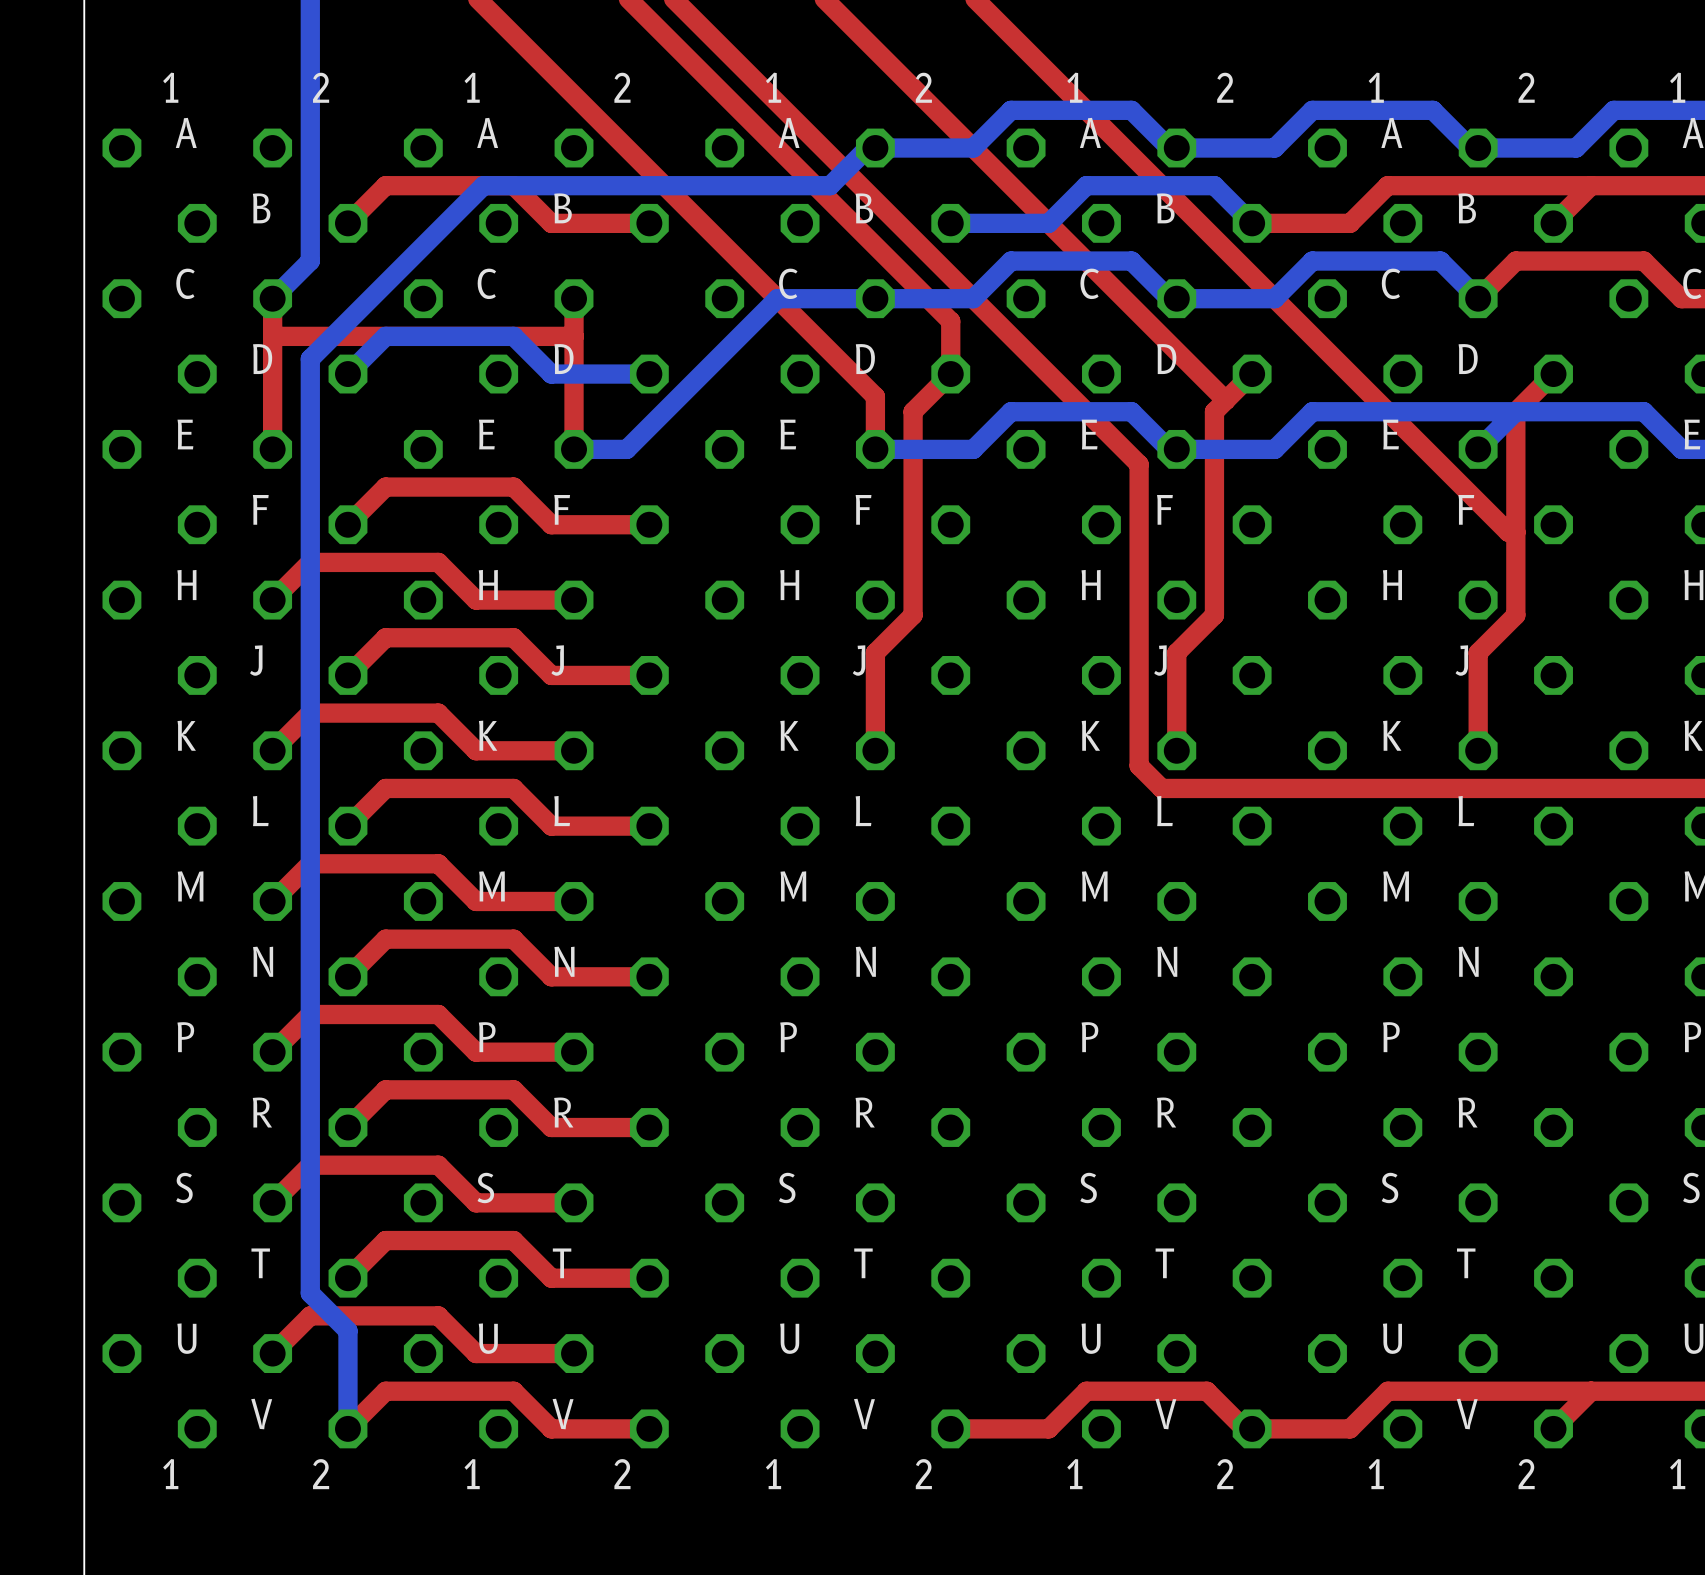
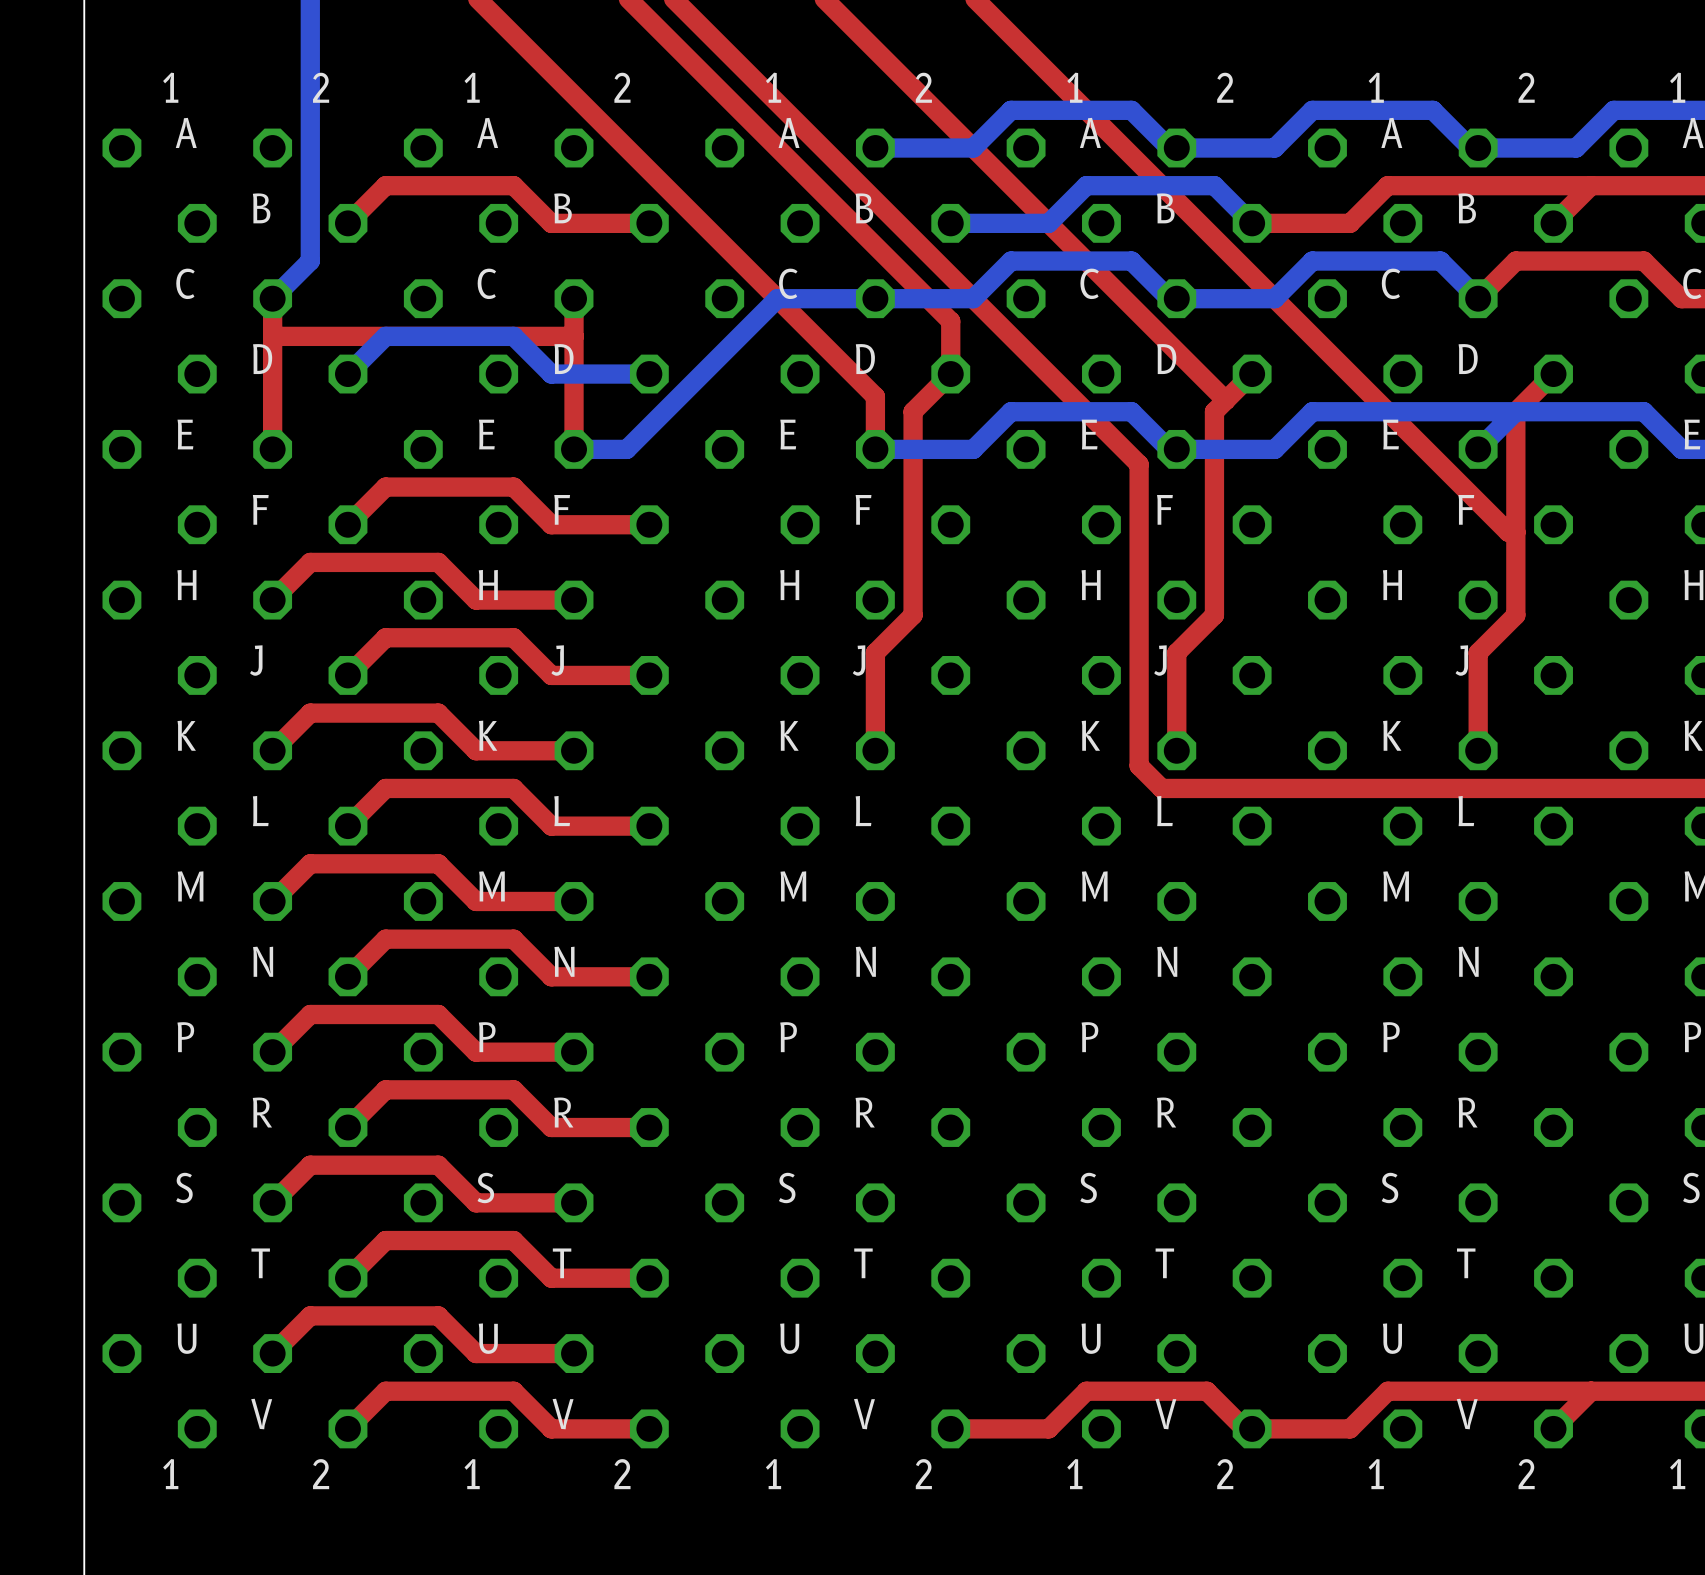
bottom track: (875, 148) (867, 148) (830, 185) (483, 185) (310, 358) (310, 1293) (347, 1330) (347, 1428) -> none

